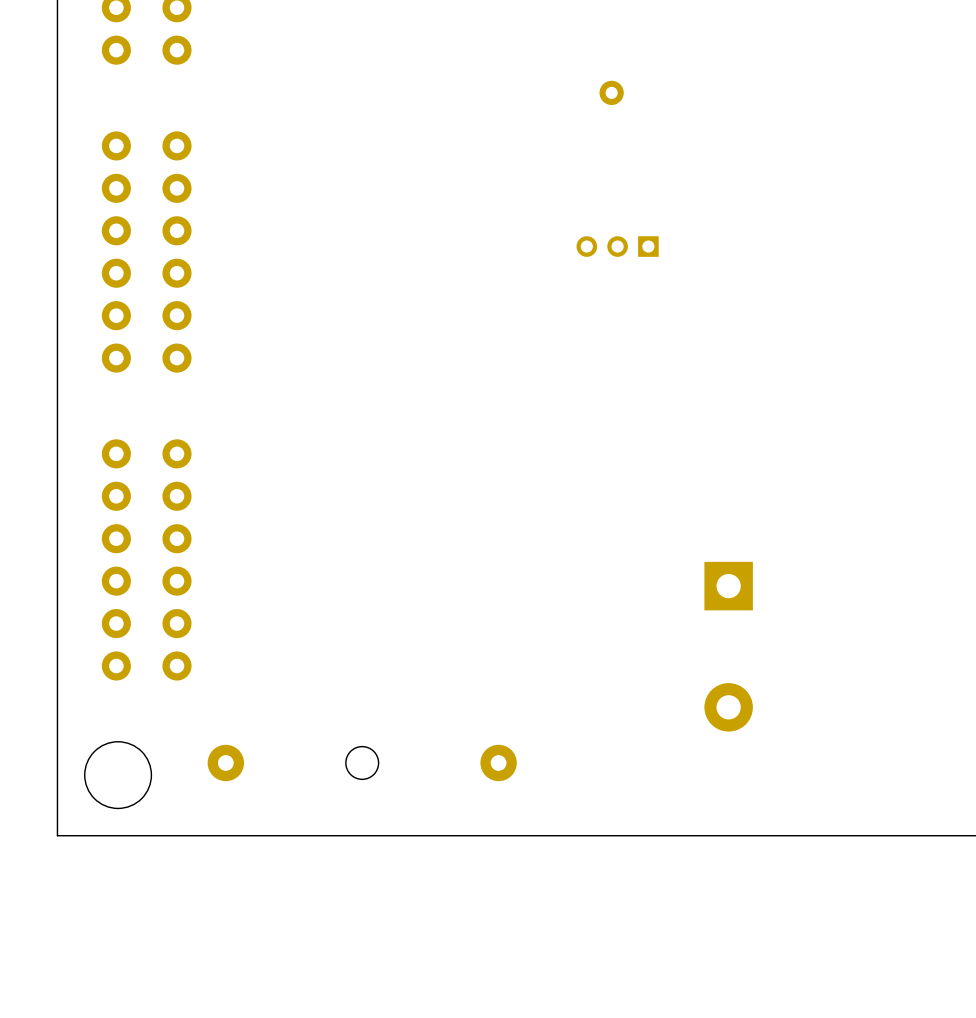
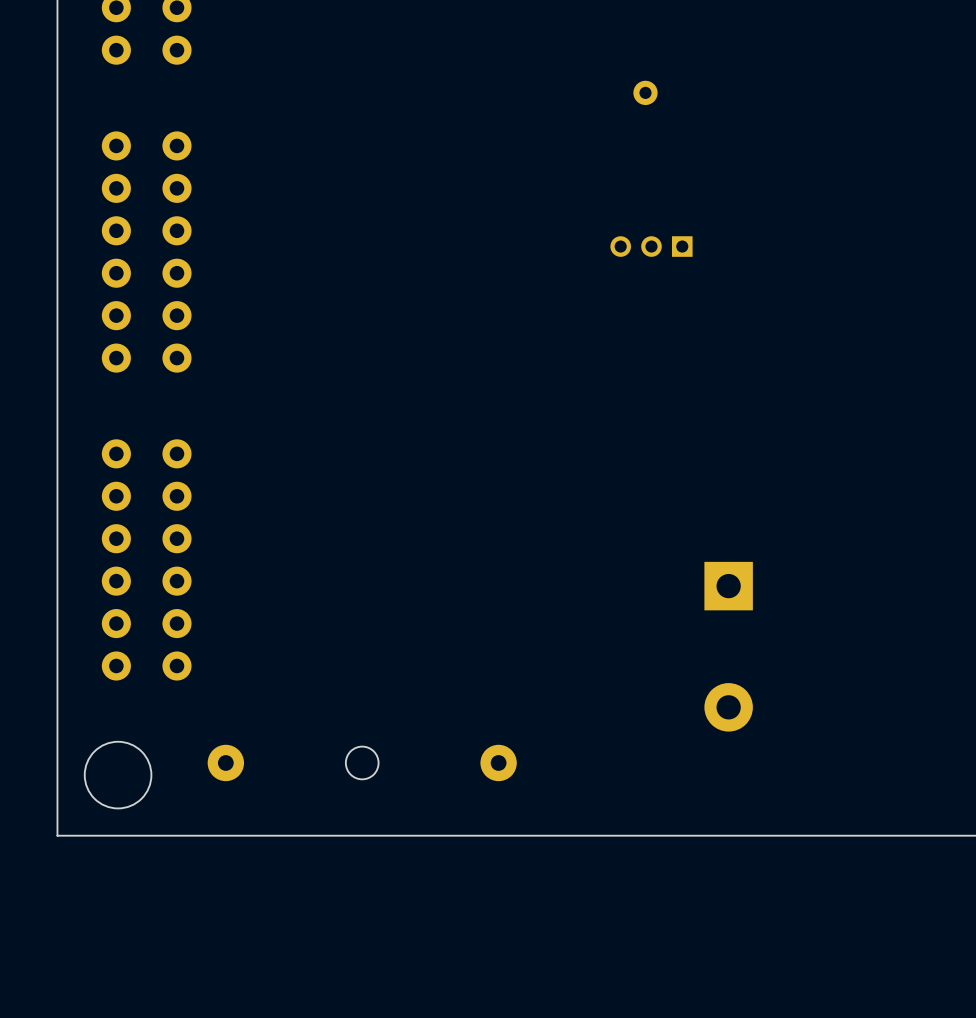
part position: (611, 92) -> (645, 92)
part position: (617, 246) -> (651, 246)

